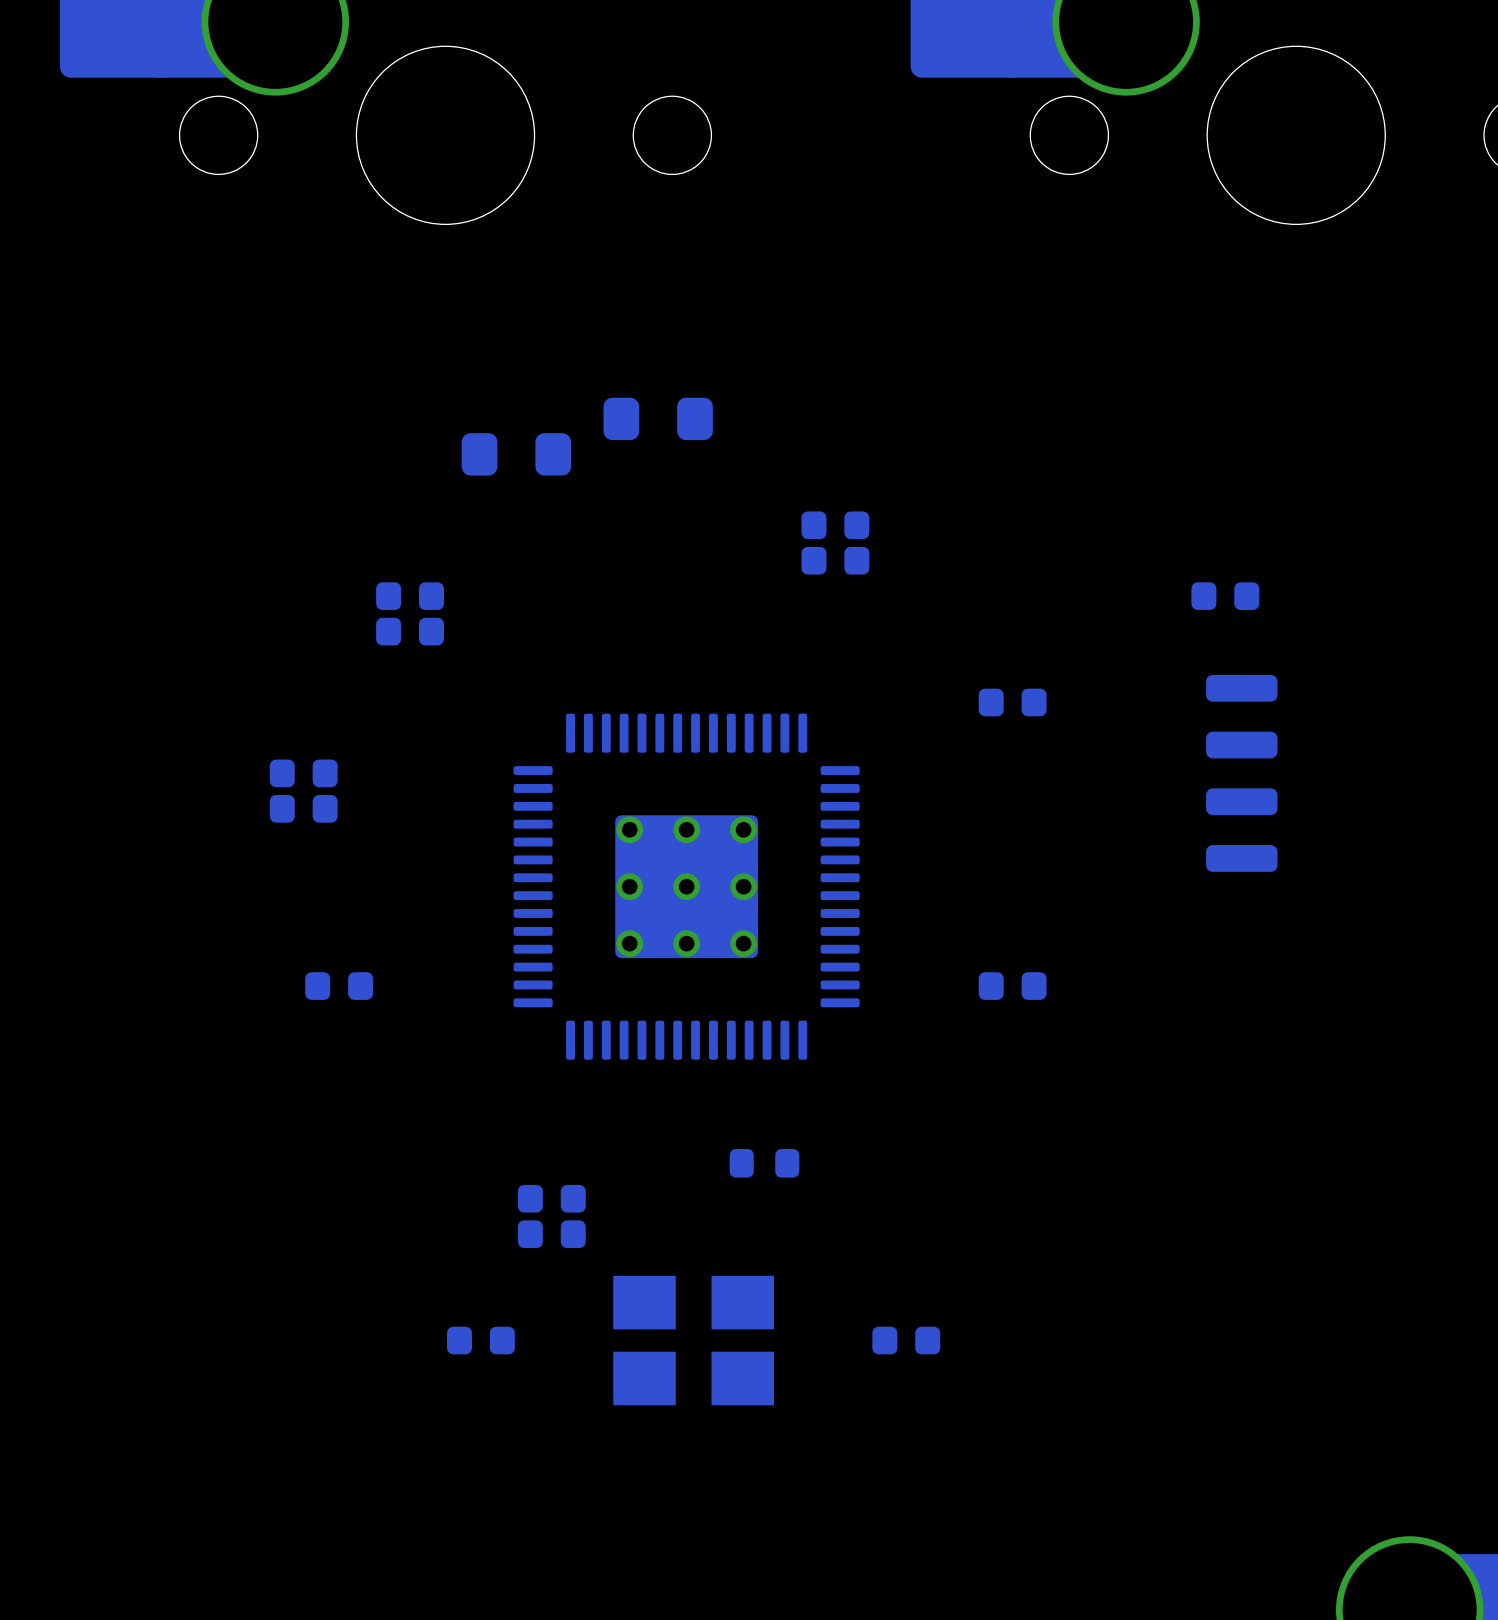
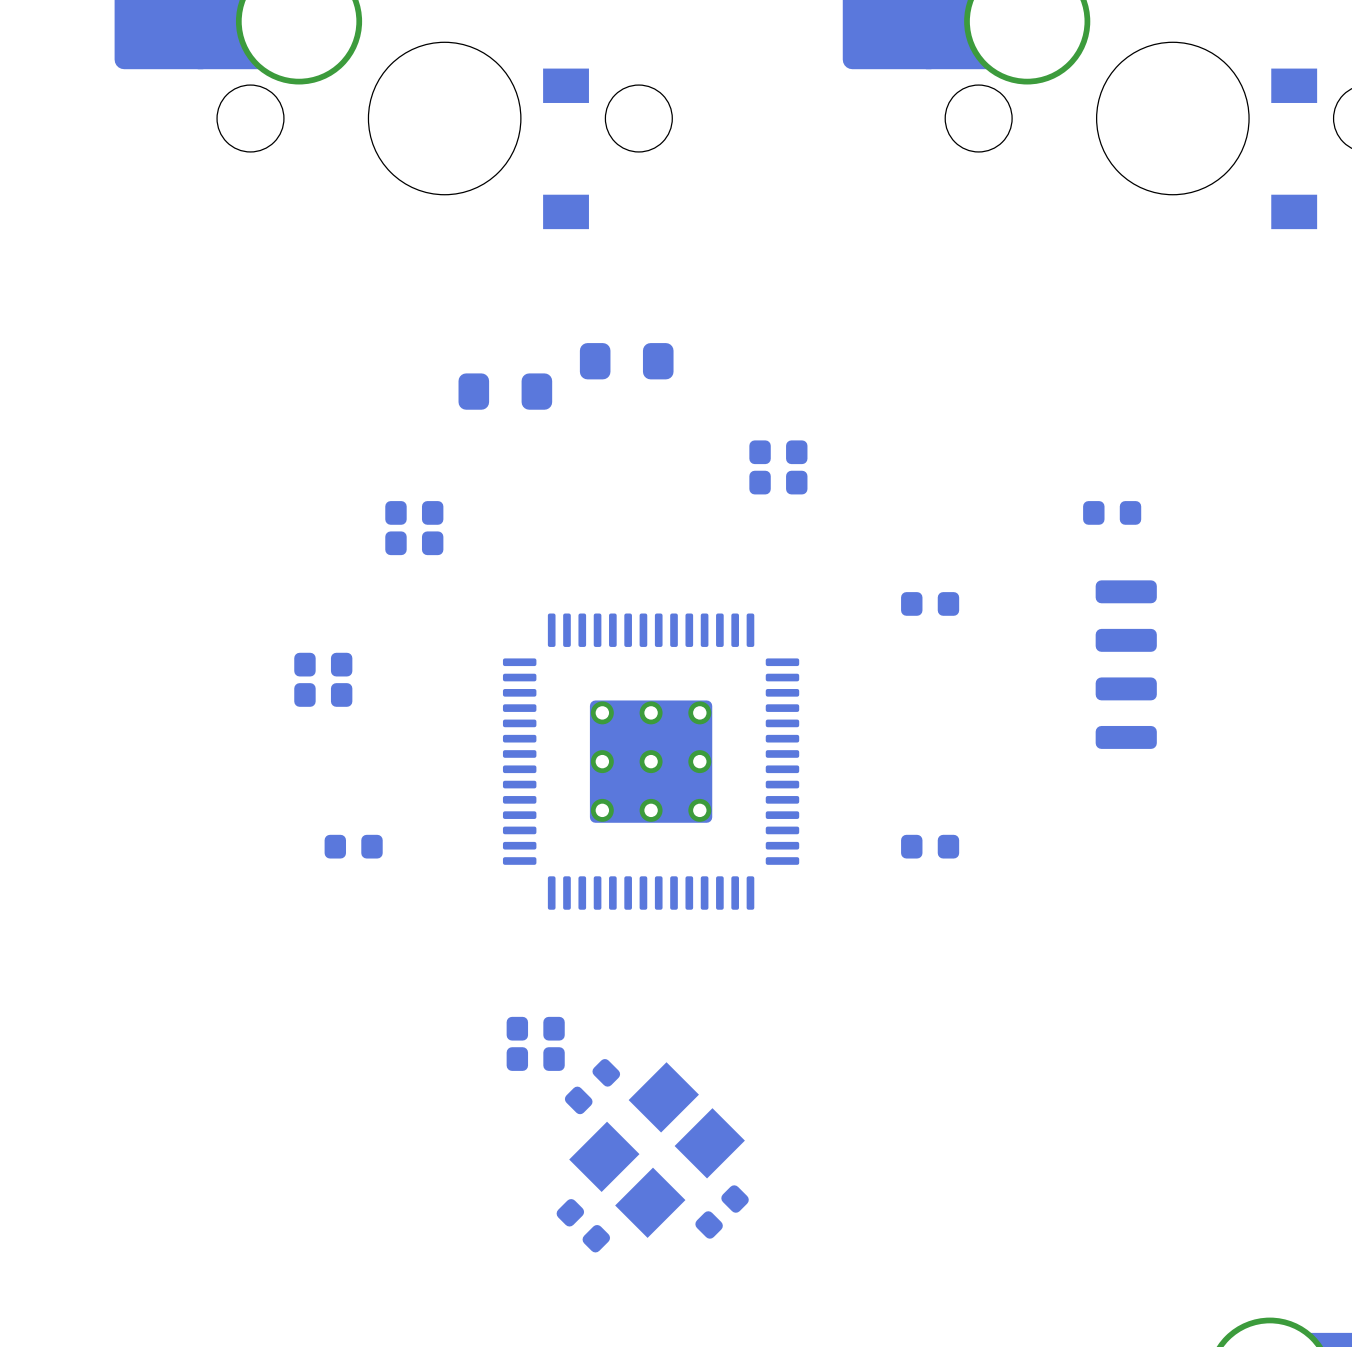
part: none -> (566, 148)
part: none -> (1294, 148)
part: (764, 1163) -> none
part: none -> (592, 1086)
part: (480, 1340) -> none
part rotation: 0° (693, 1340) -> 45° counterclockwise (657, 1150)
part: (906, 1340) -> none
part: none -> (722, 1212)
part: none -> (583, 1225)

